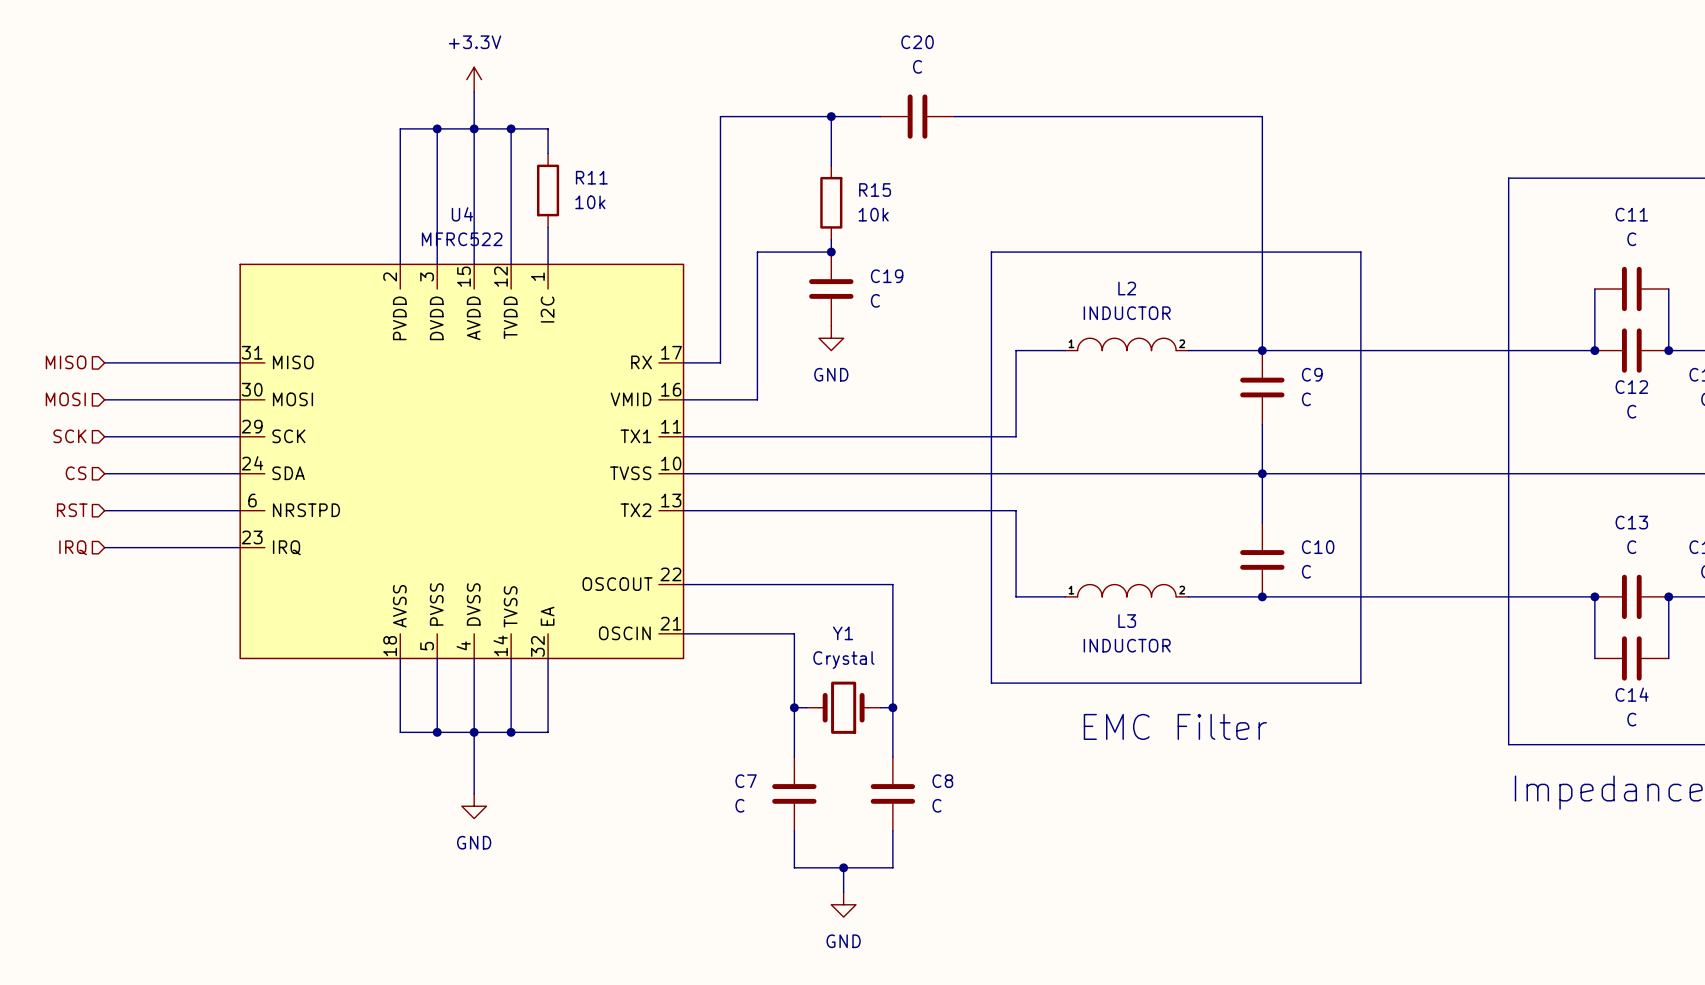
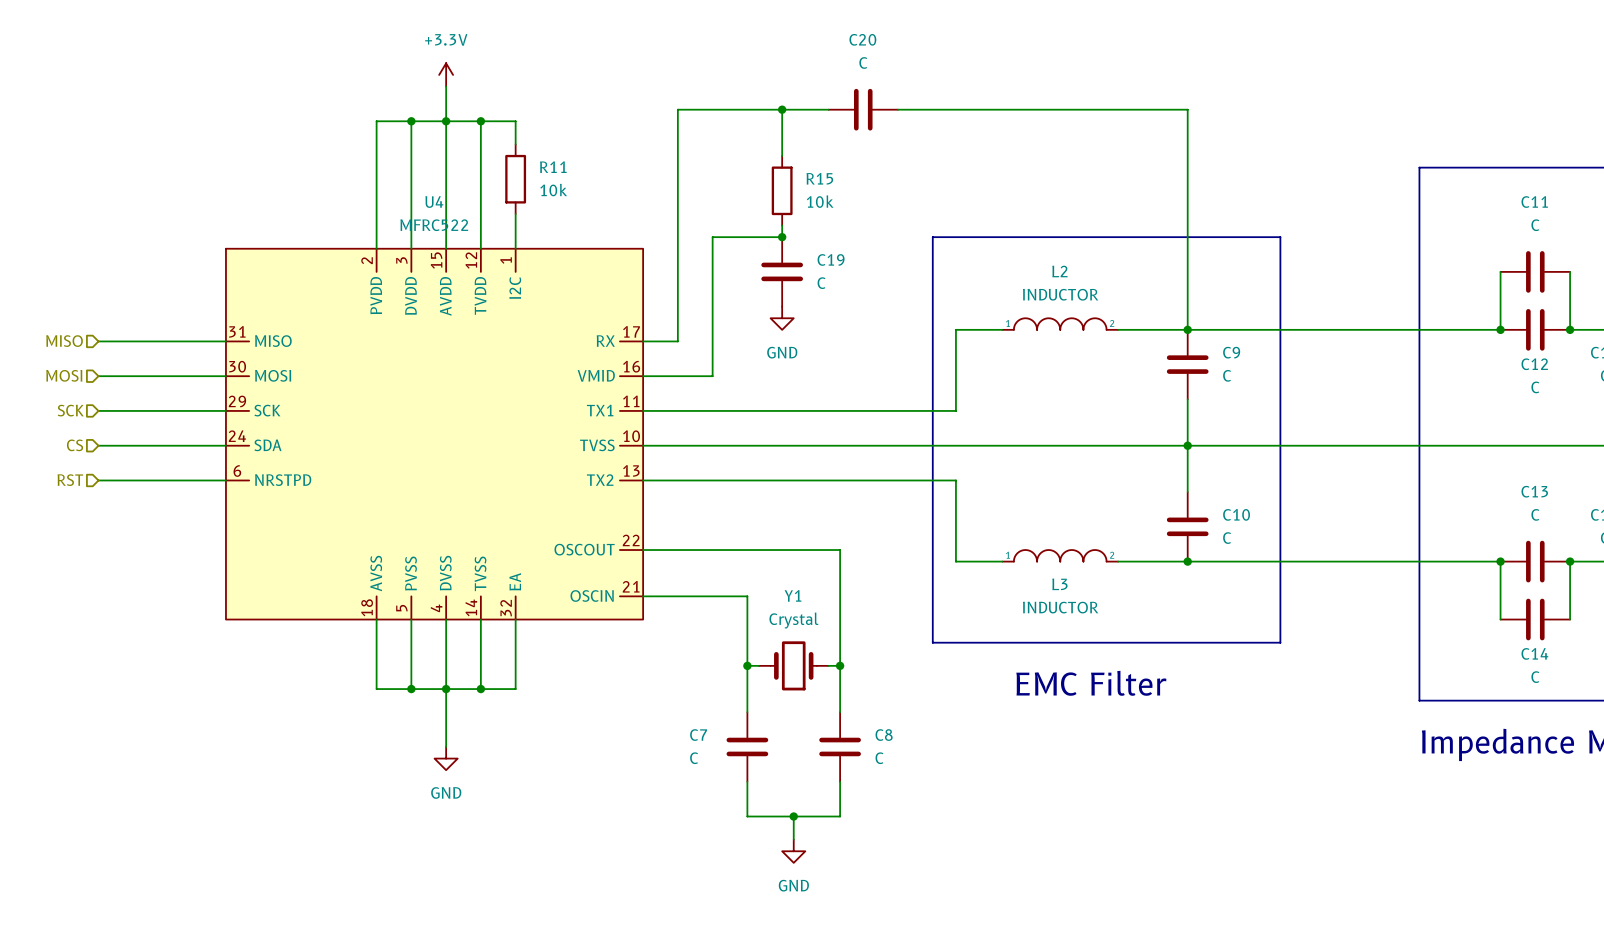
U4 symbol: [239, 263, 685, 660] -> [225, 248, 644, 621]
hierarchical label: IRQ (73, 547) -> none
wire: (104, 547) (240, 547) -> none

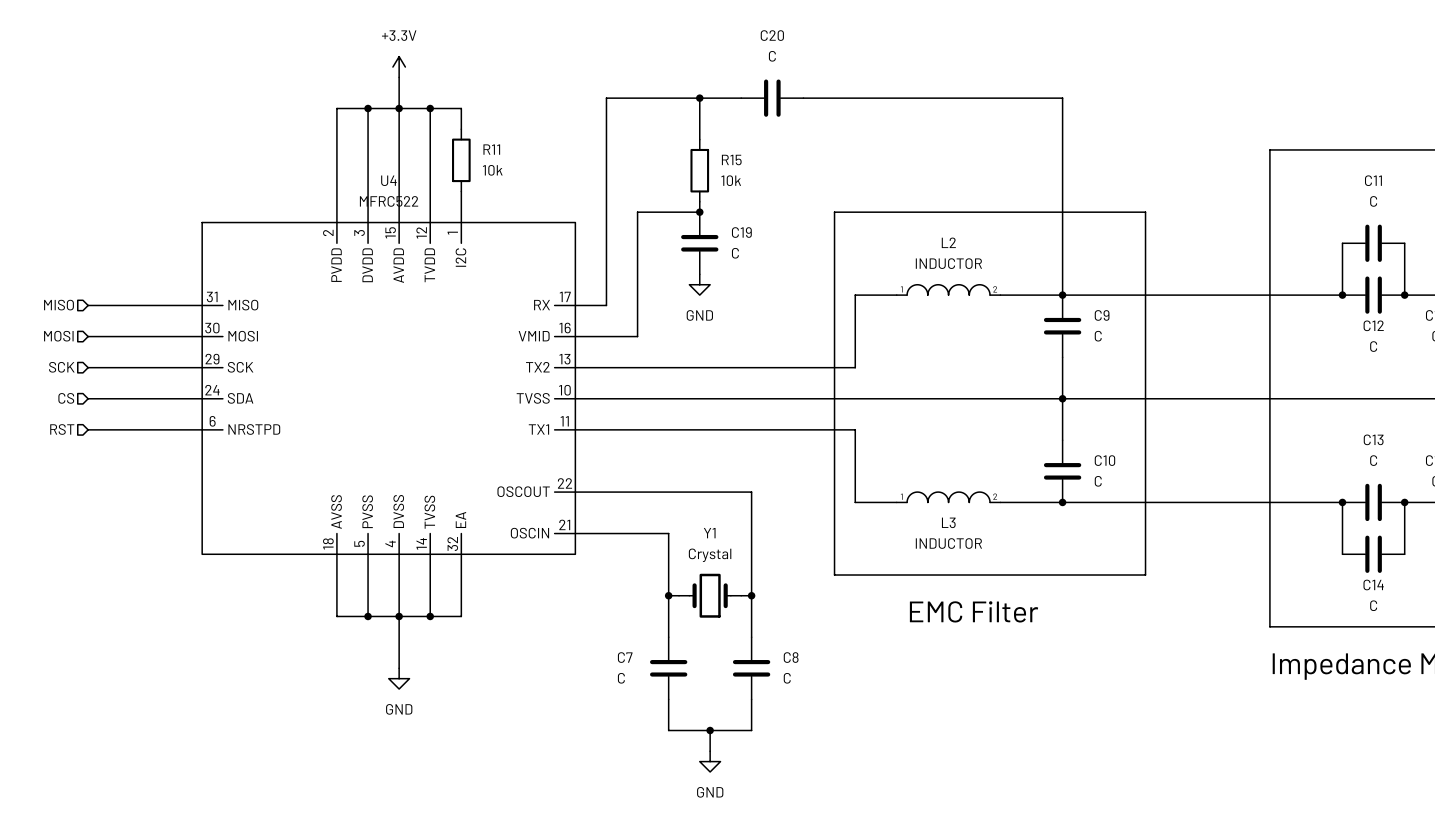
U4 pin number: 11 (631, 401) -> 13 (564, 359)
U4 pin name: TX1 (600, 410) -> TX2 (537, 367)
U4 pin number: 13 (631, 470) -> 11 (564, 421)
U4 pin name: TX2 (600, 480) -> TX1 (538, 429)

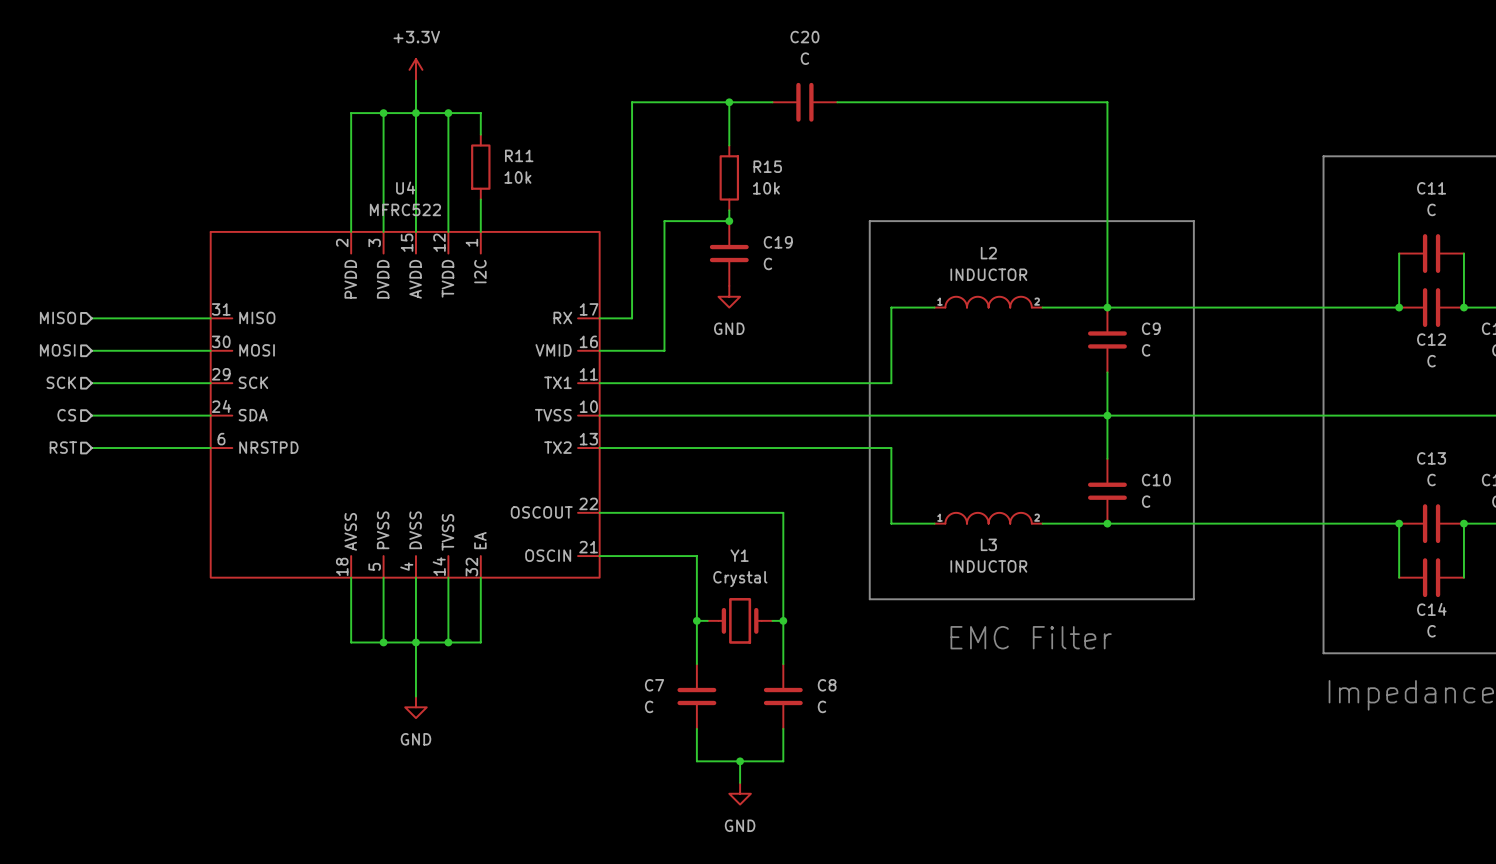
U4 pin number: 13 (564, 359) -> 11 (588, 374)
U4 pin name: TX2 (537, 367) -> TX1 (557, 382)
U4 pin number: 11 (564, 421) -> 13 (588, 439)
U4 pin name: TX1 (538, 429) -> TX2 (557, 447)

